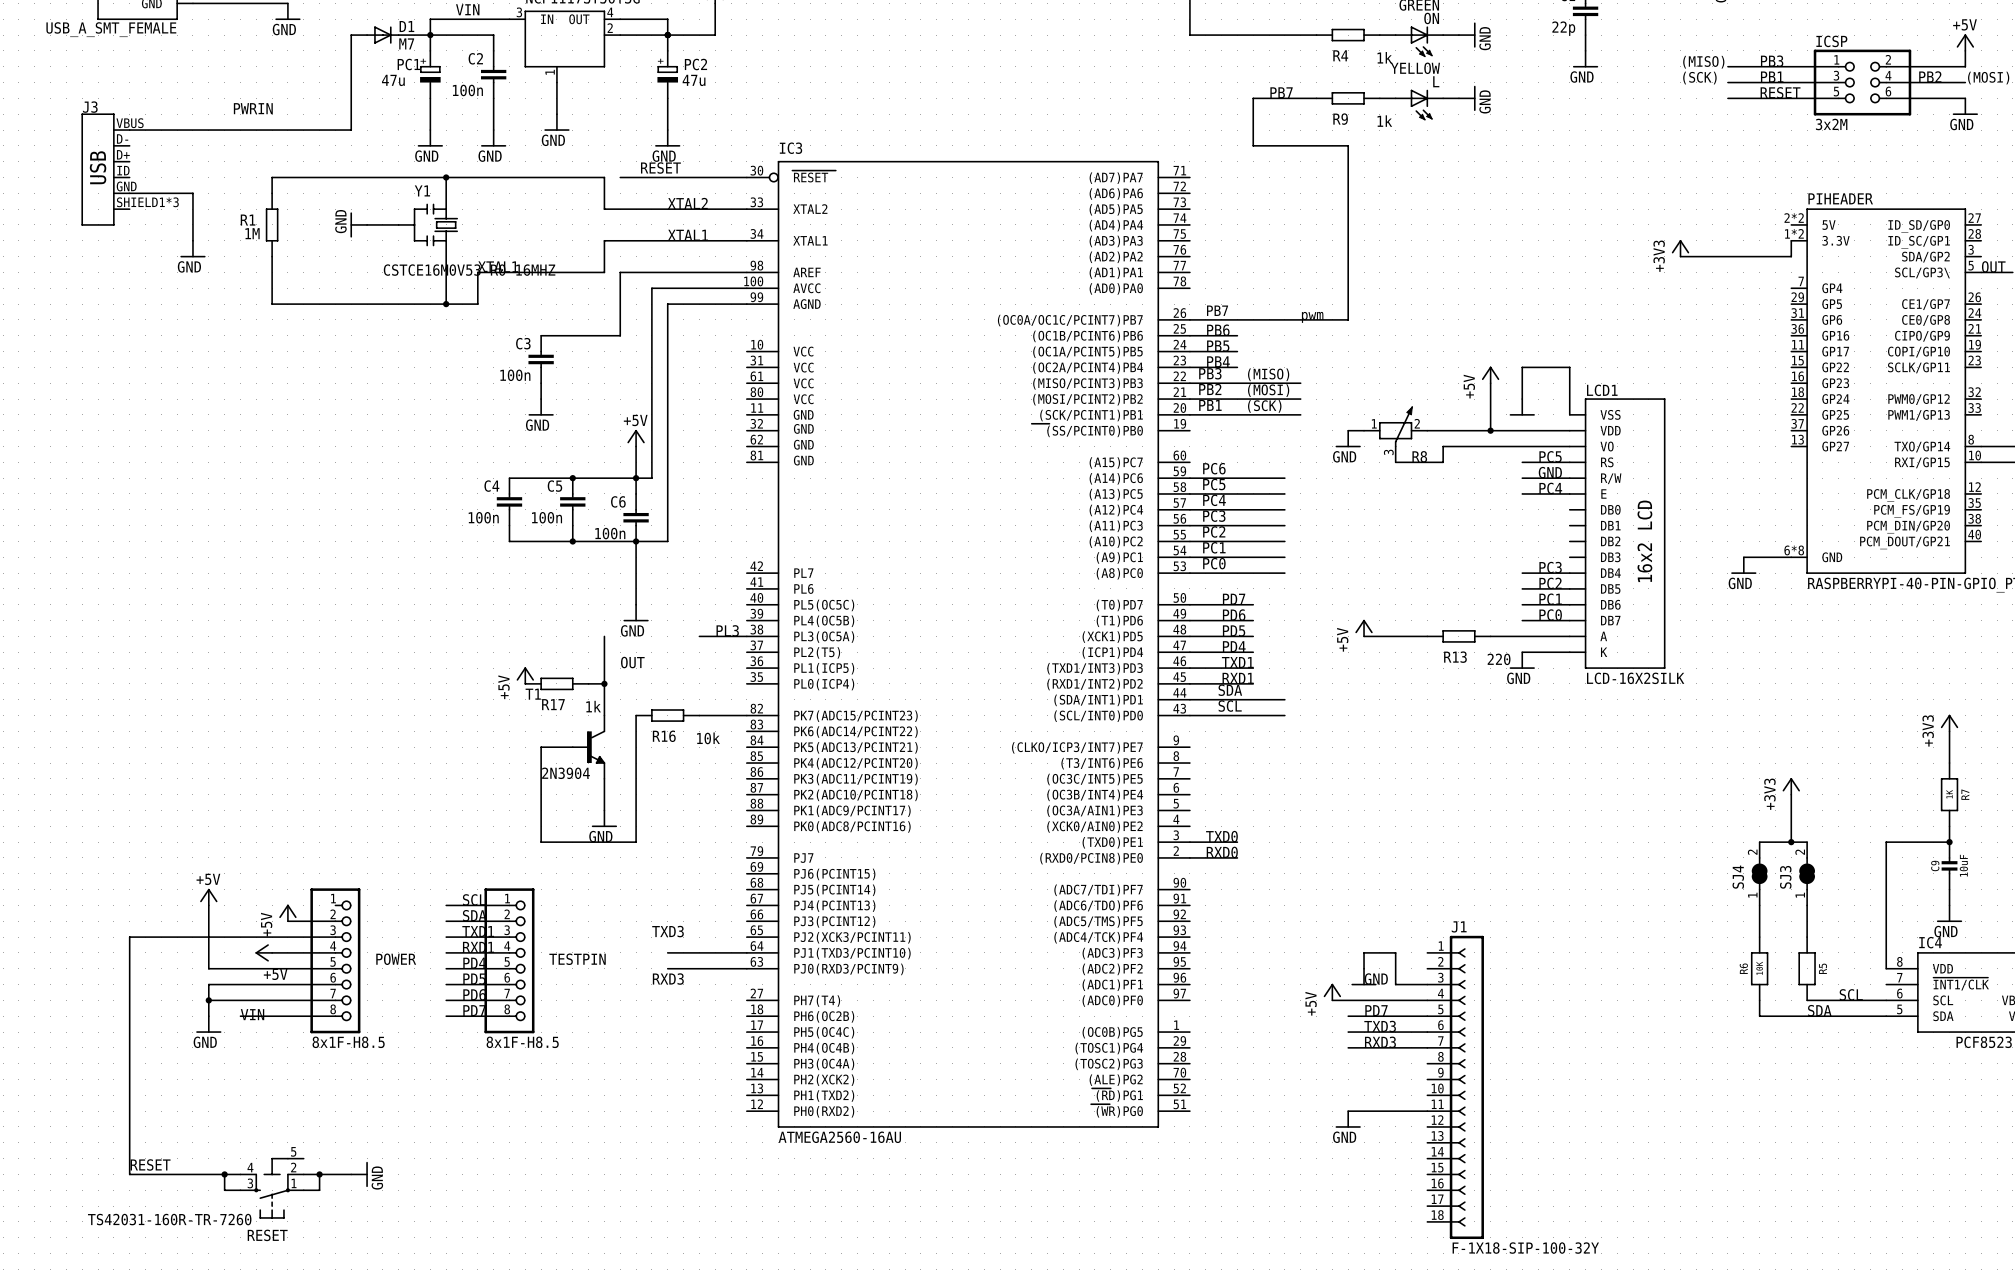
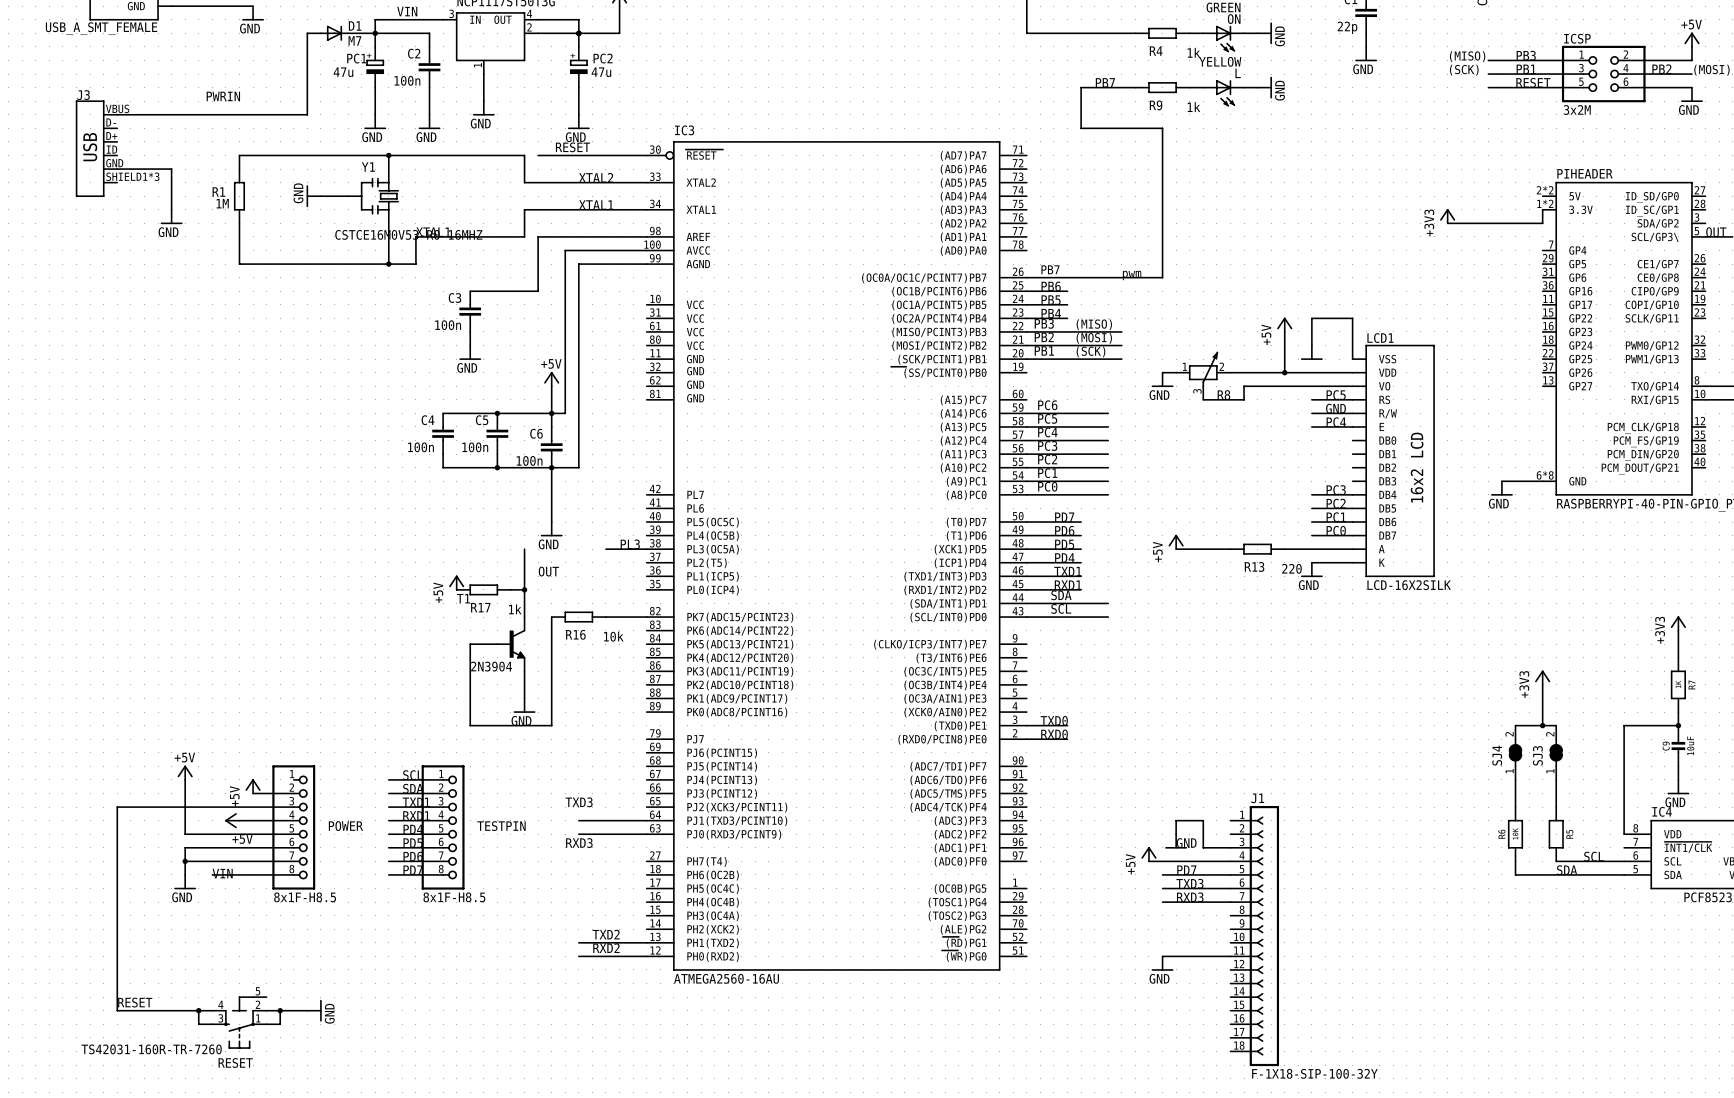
label: none -> TXD2 (606, 934)
wire: none -> (578, 942) (646, 942)
label: none -> RXD2 (606, 948)
wire: none -> (578, 956) (646, 956)

